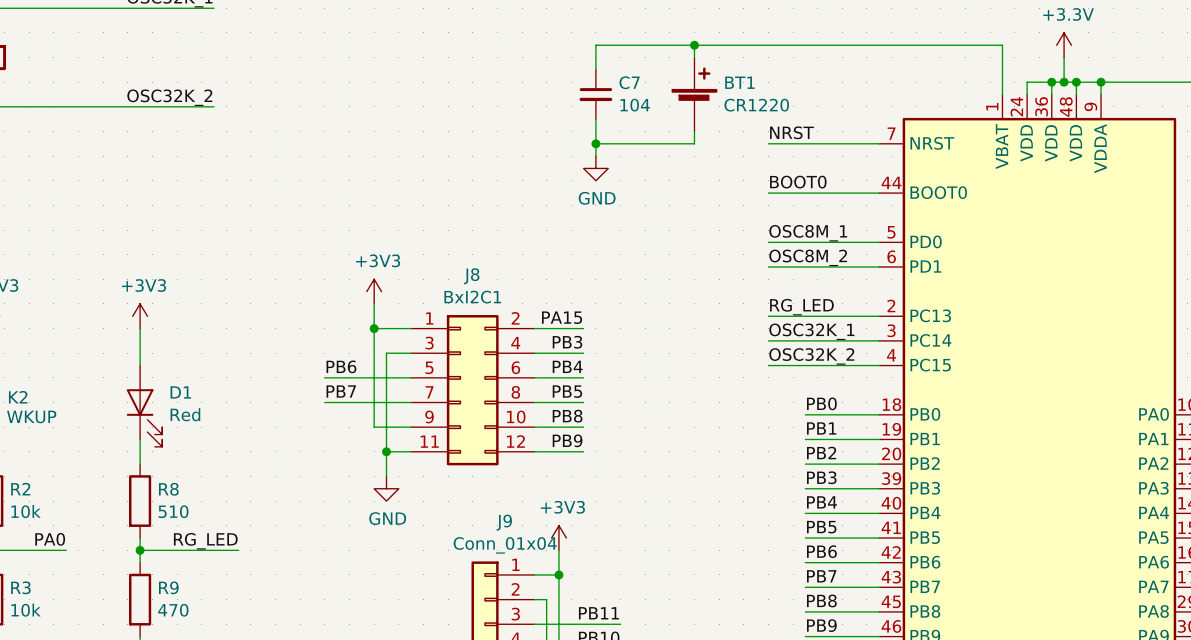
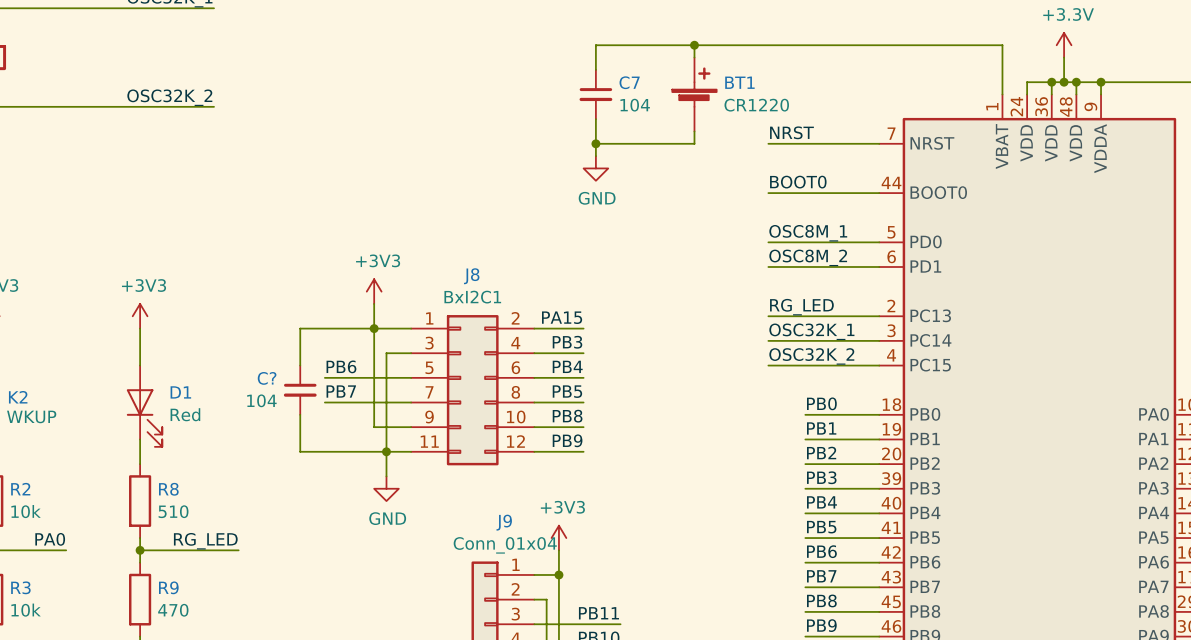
wire: none -> (374, 328) (300, 328) (300, 365)
C?: none -> 104 (300, 390)
wire: none -> (300, 414) (300, 451) (386, 451)

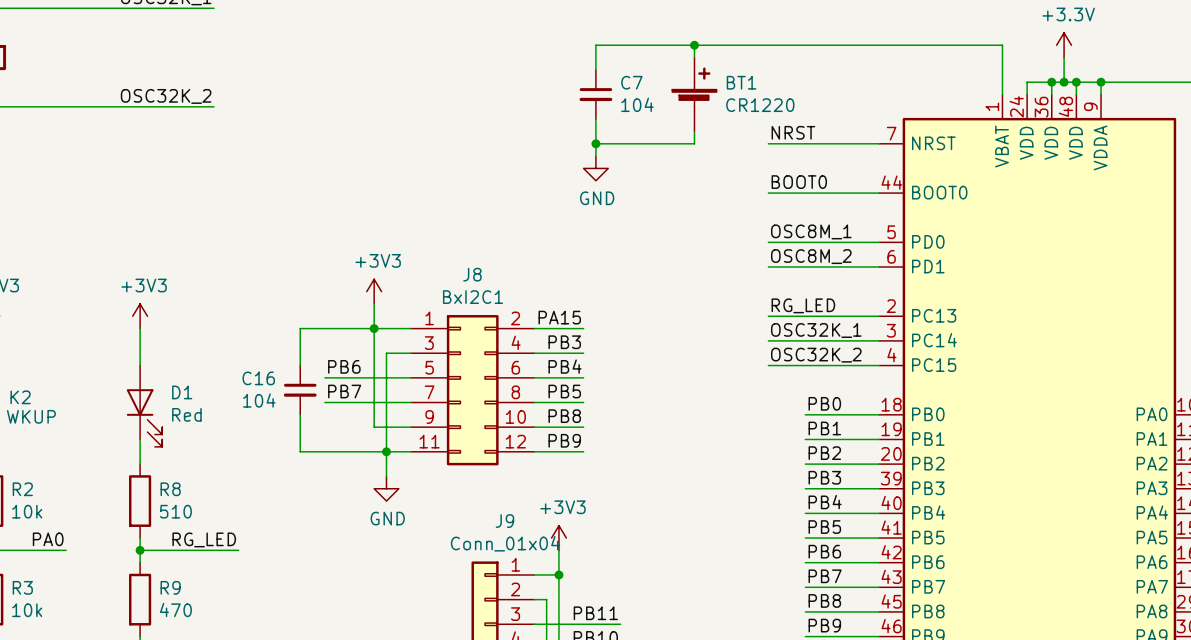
C? name: C? (267, 378) -> C16 (258, 378)

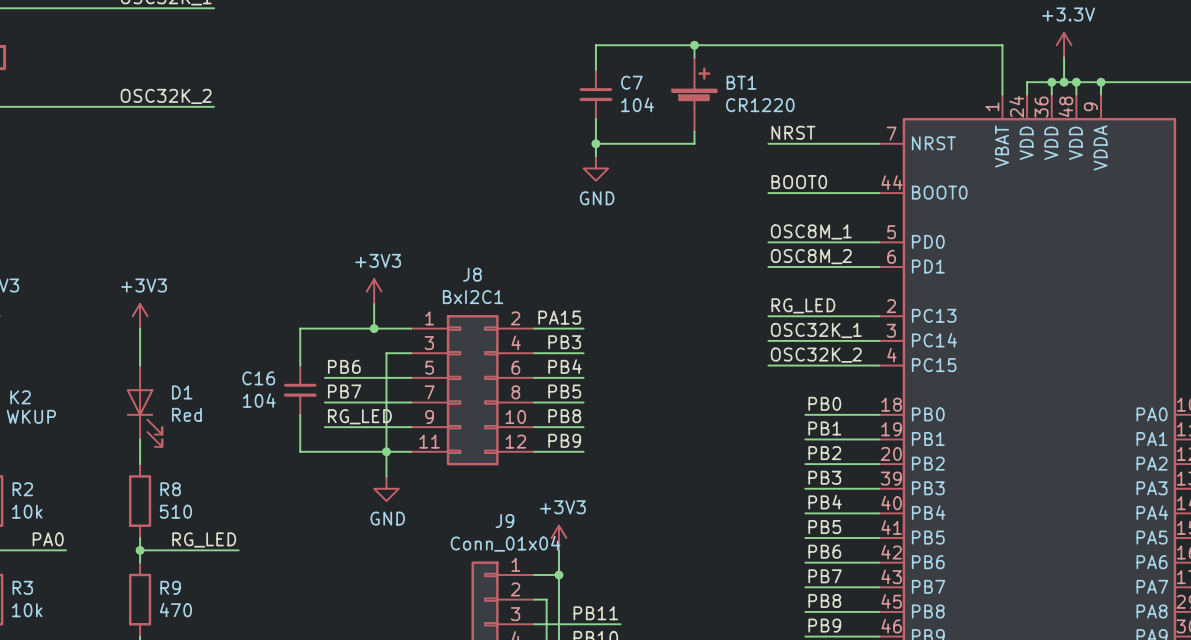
wire: (374, 328) (374, 427) -> (324, 427) (374, 427)
label: none -> RG_LED (359, 416)

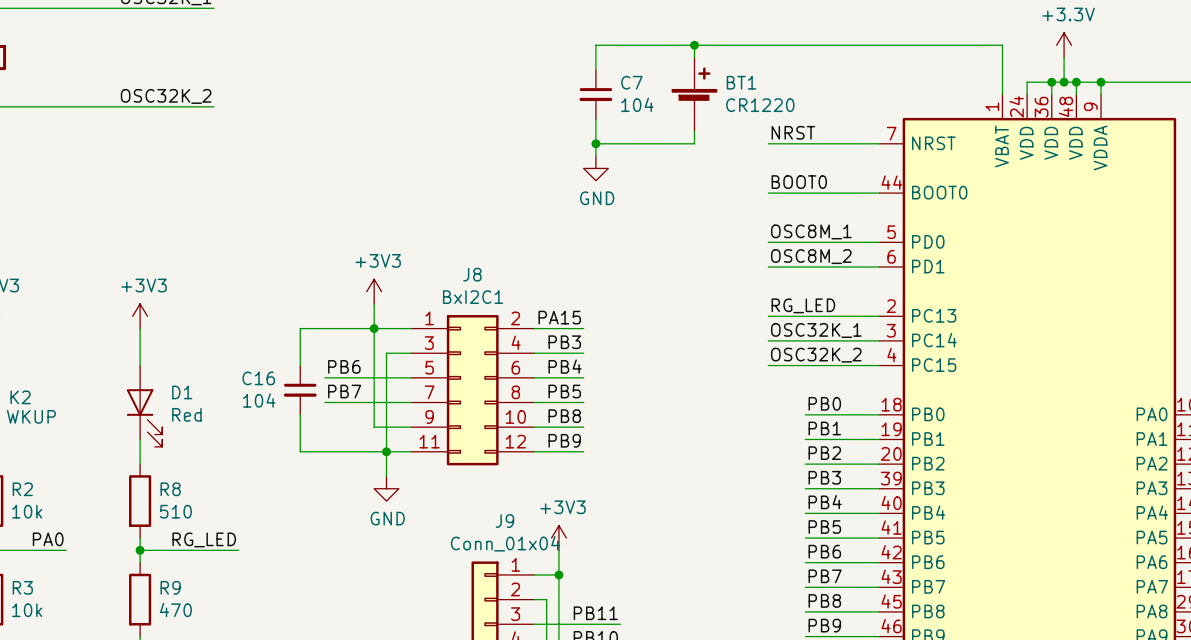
label: RG_LED (359, 416) -> none
wire: (324, 427) (374, 427) -> (374, 328) (374, 427)

